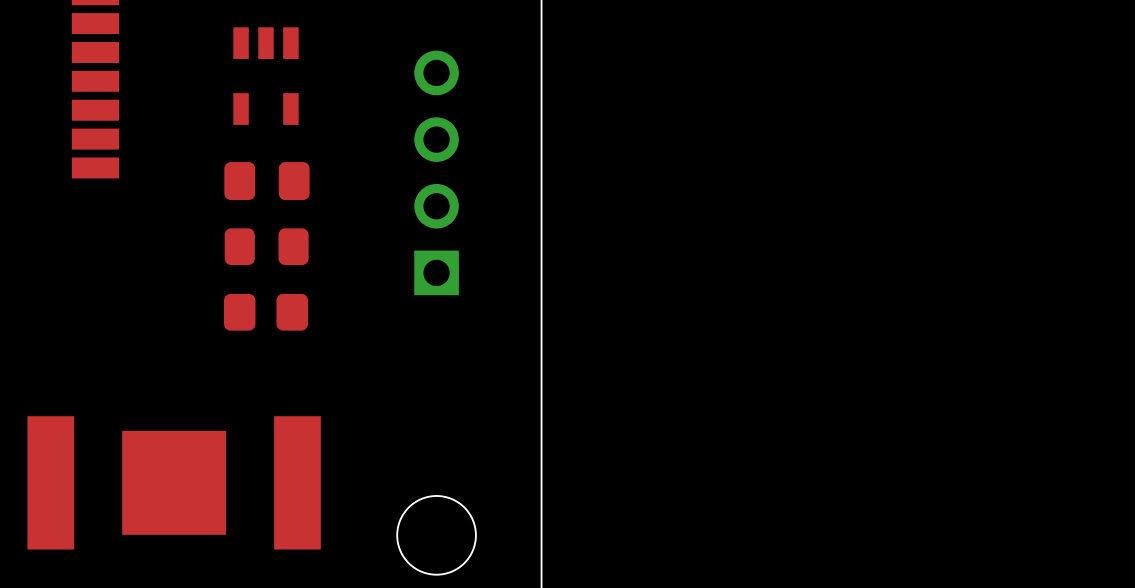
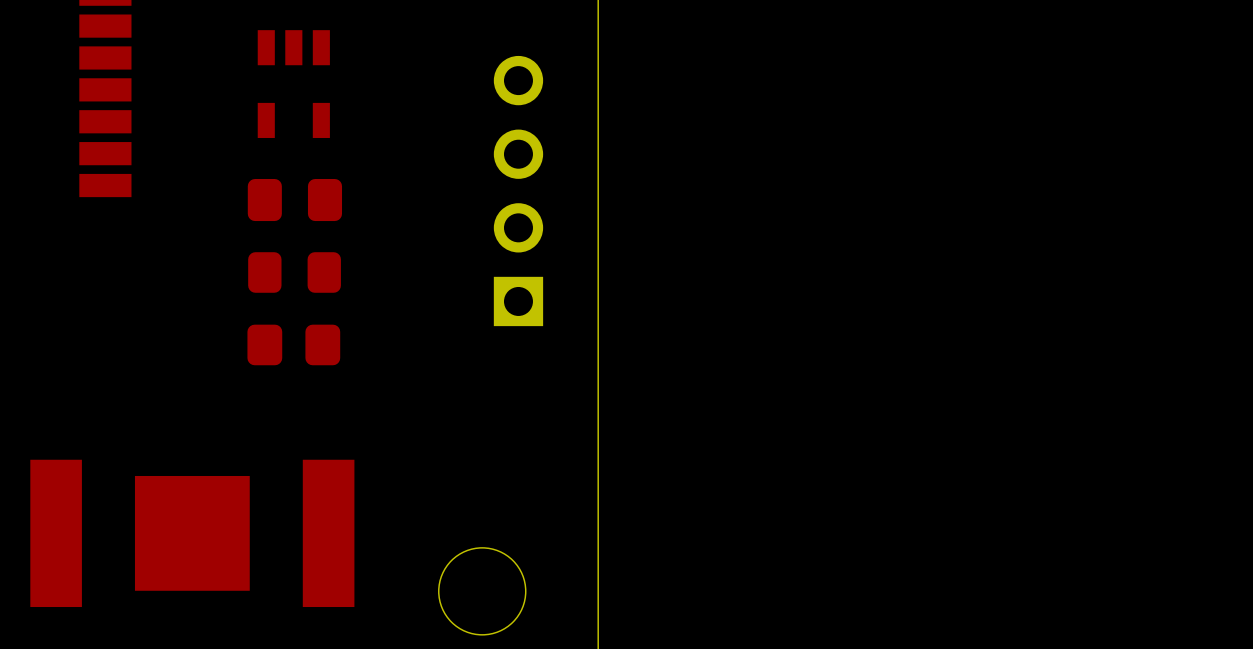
part position: (436, 172) -> (518, 191)

